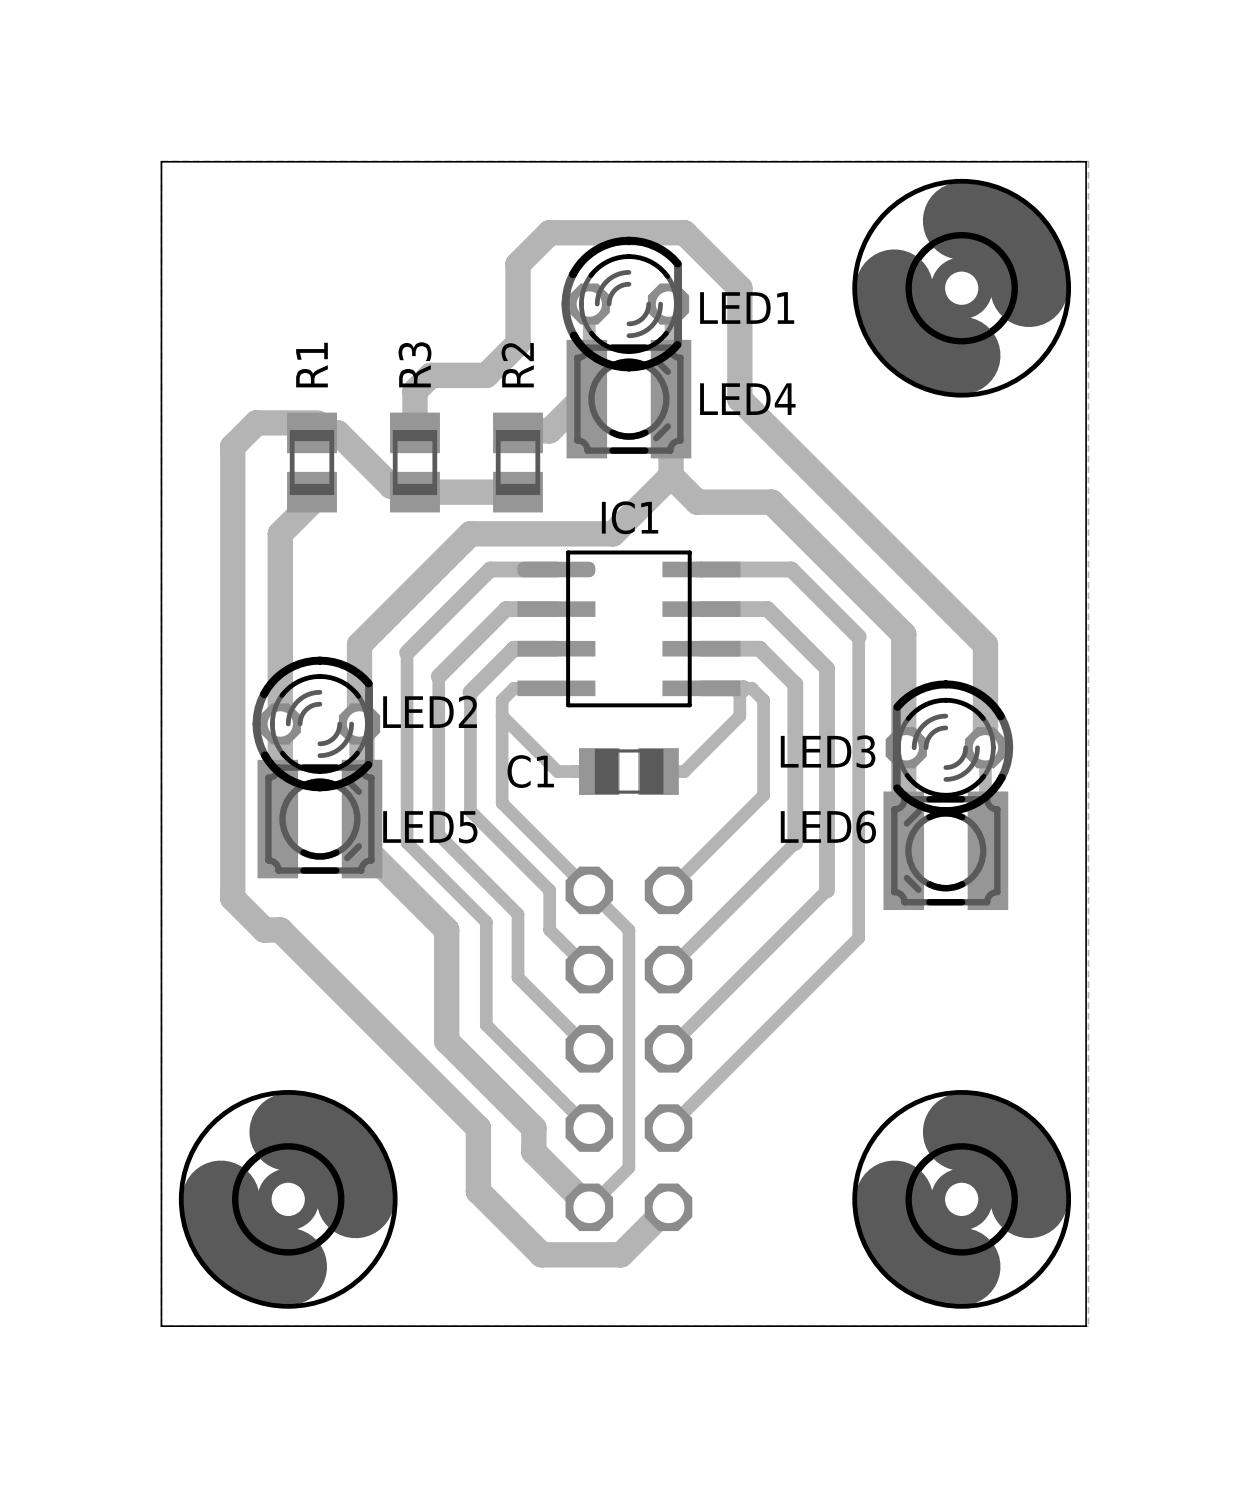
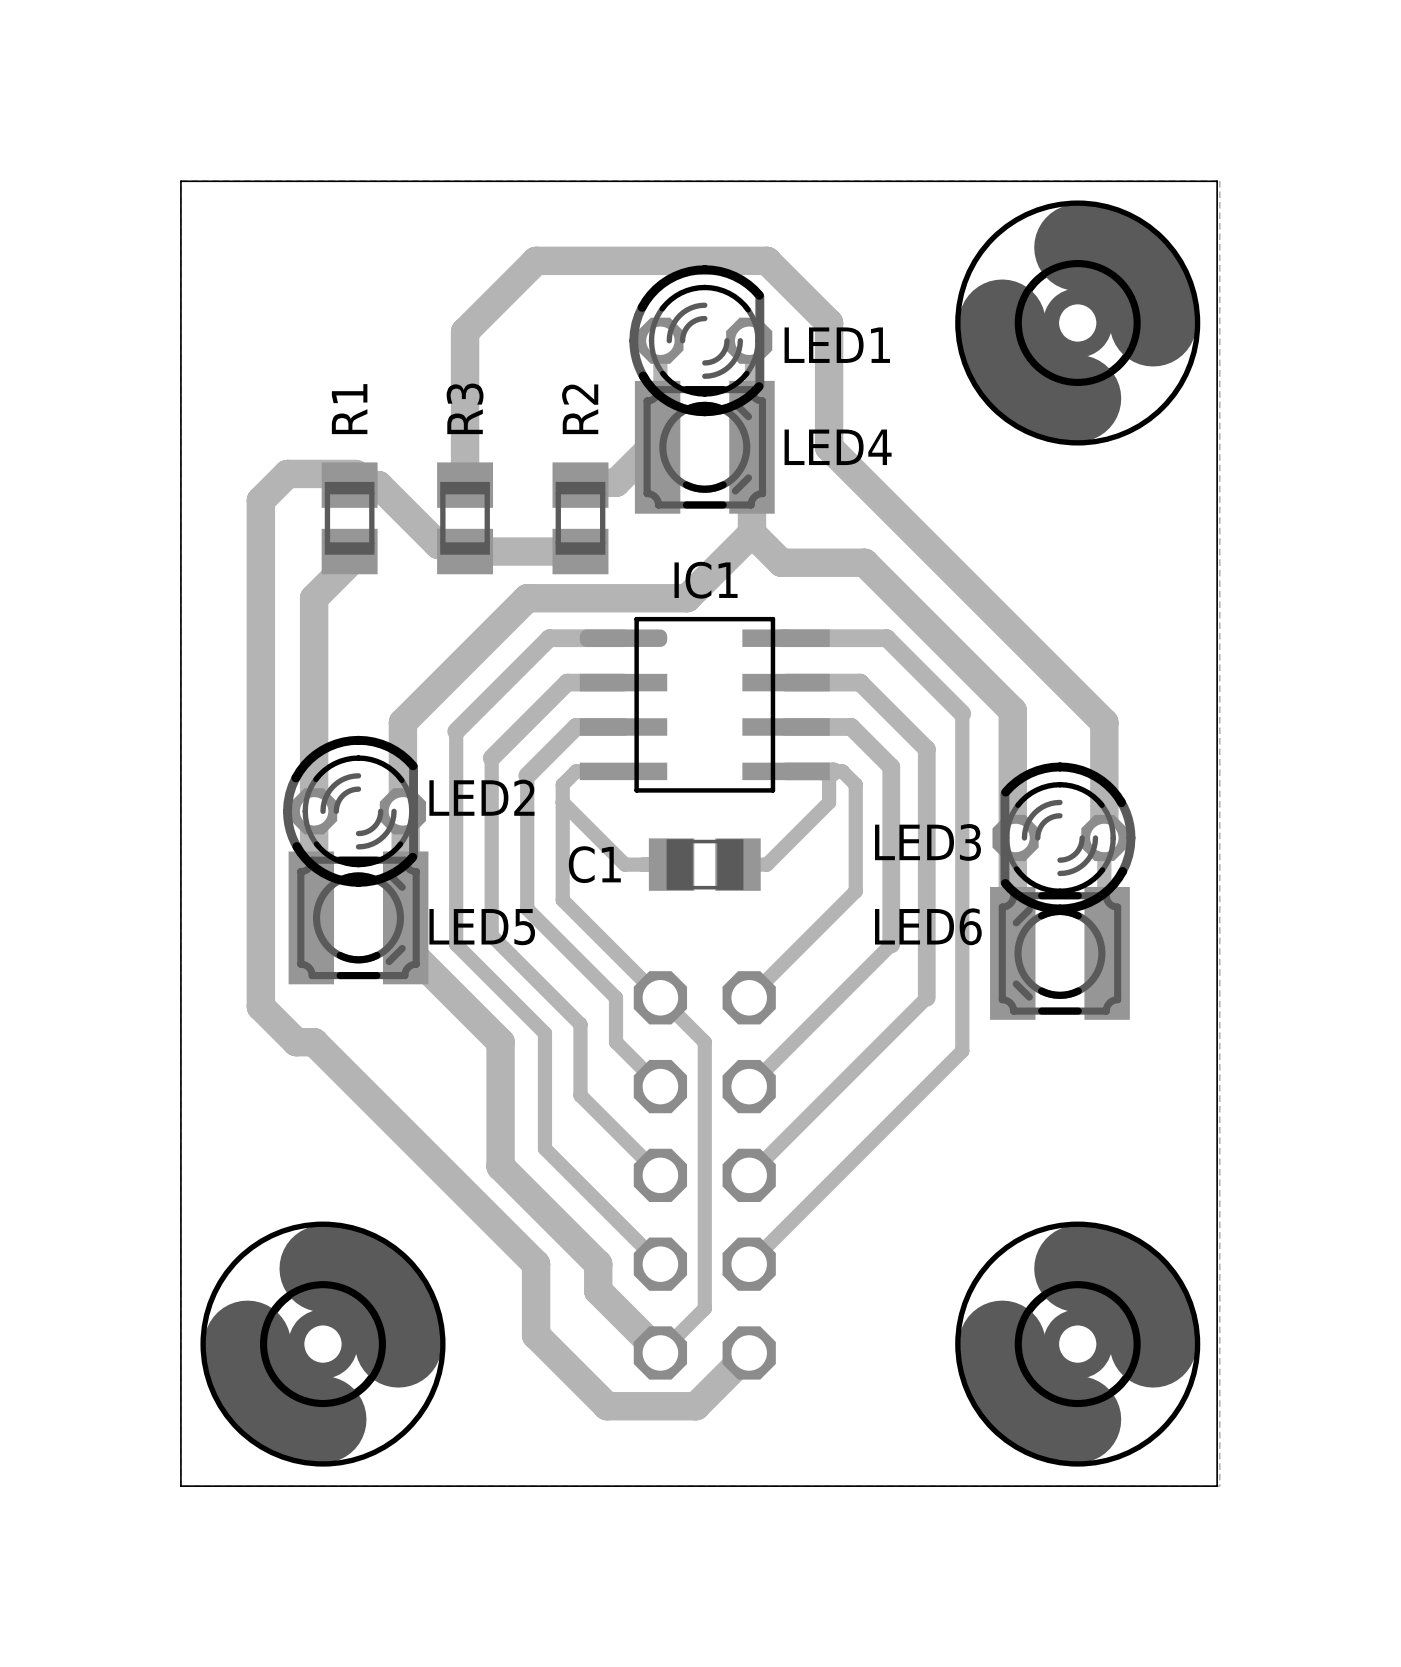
track: (549, 232) (517, 264) (517, 343) (486, 375) (430, 375) (414, 391) -> (616, 260) (536, 260) (465, 331) (465, 438)

